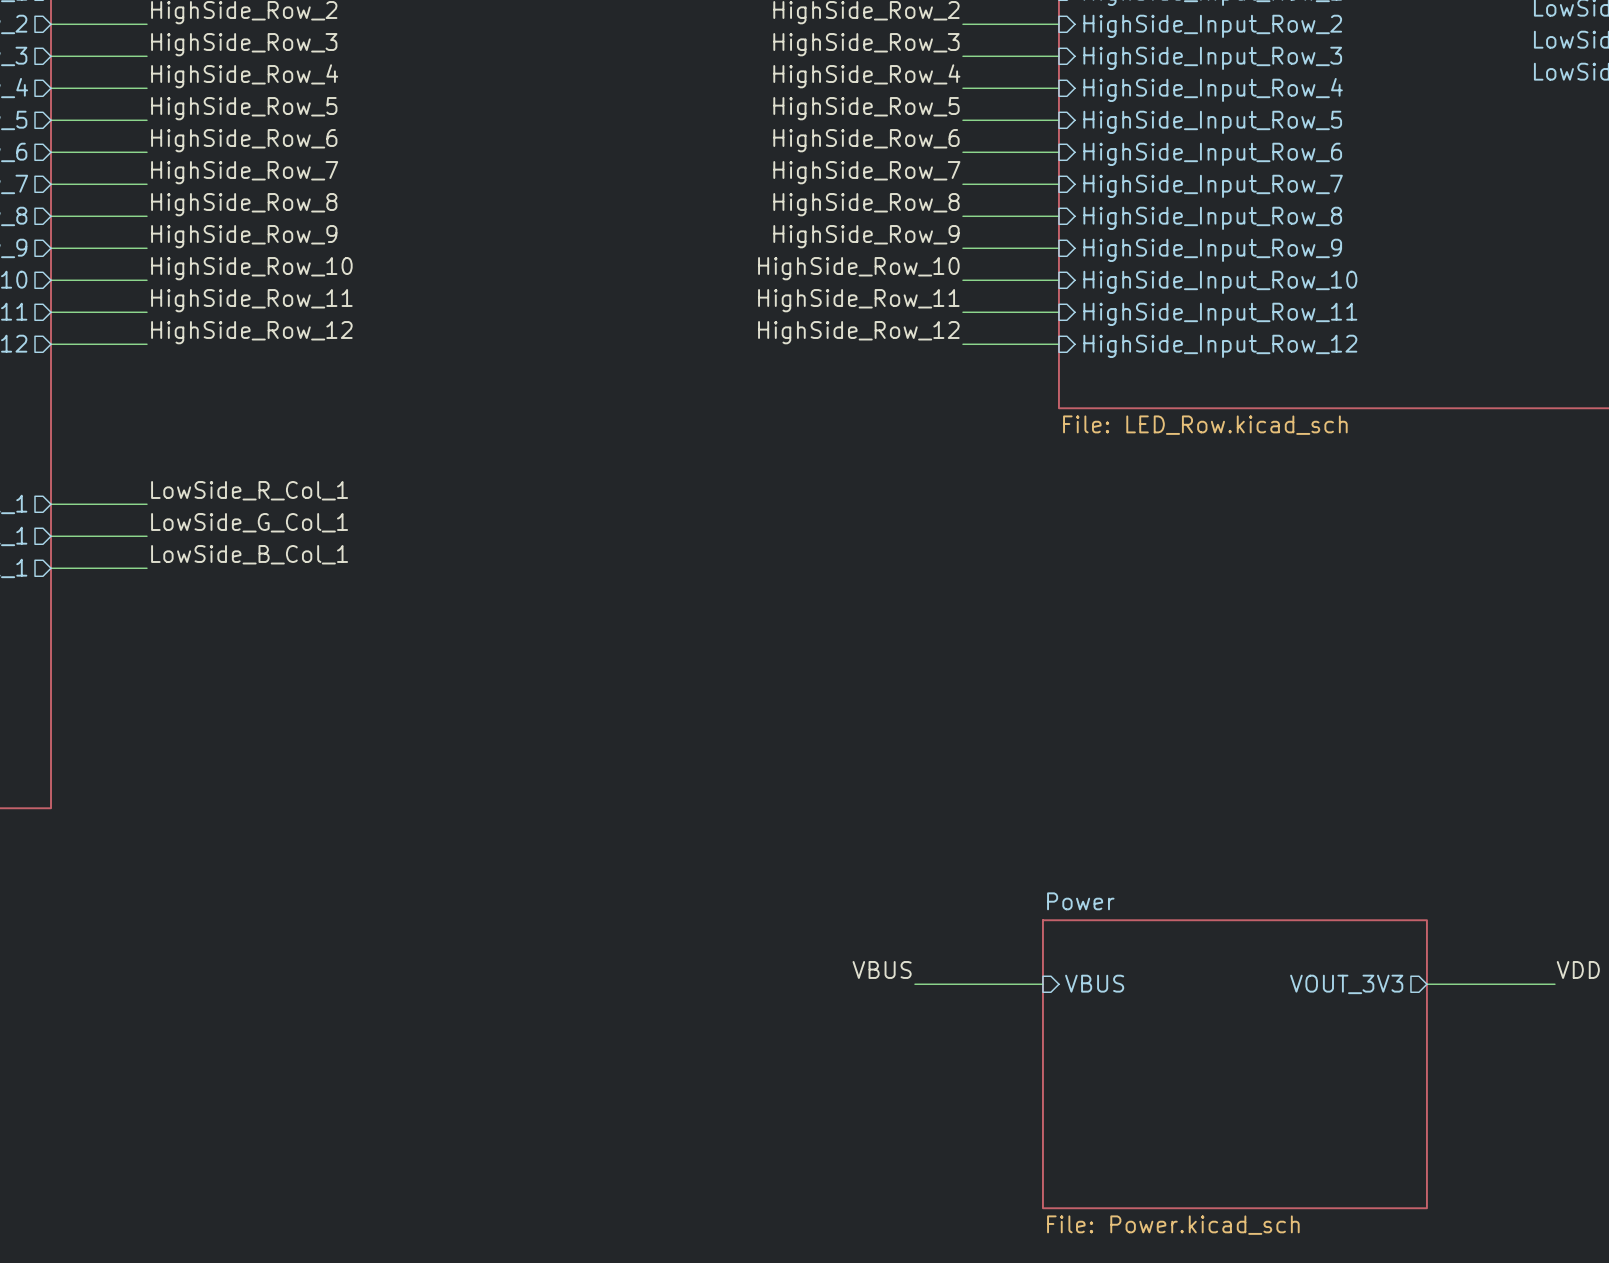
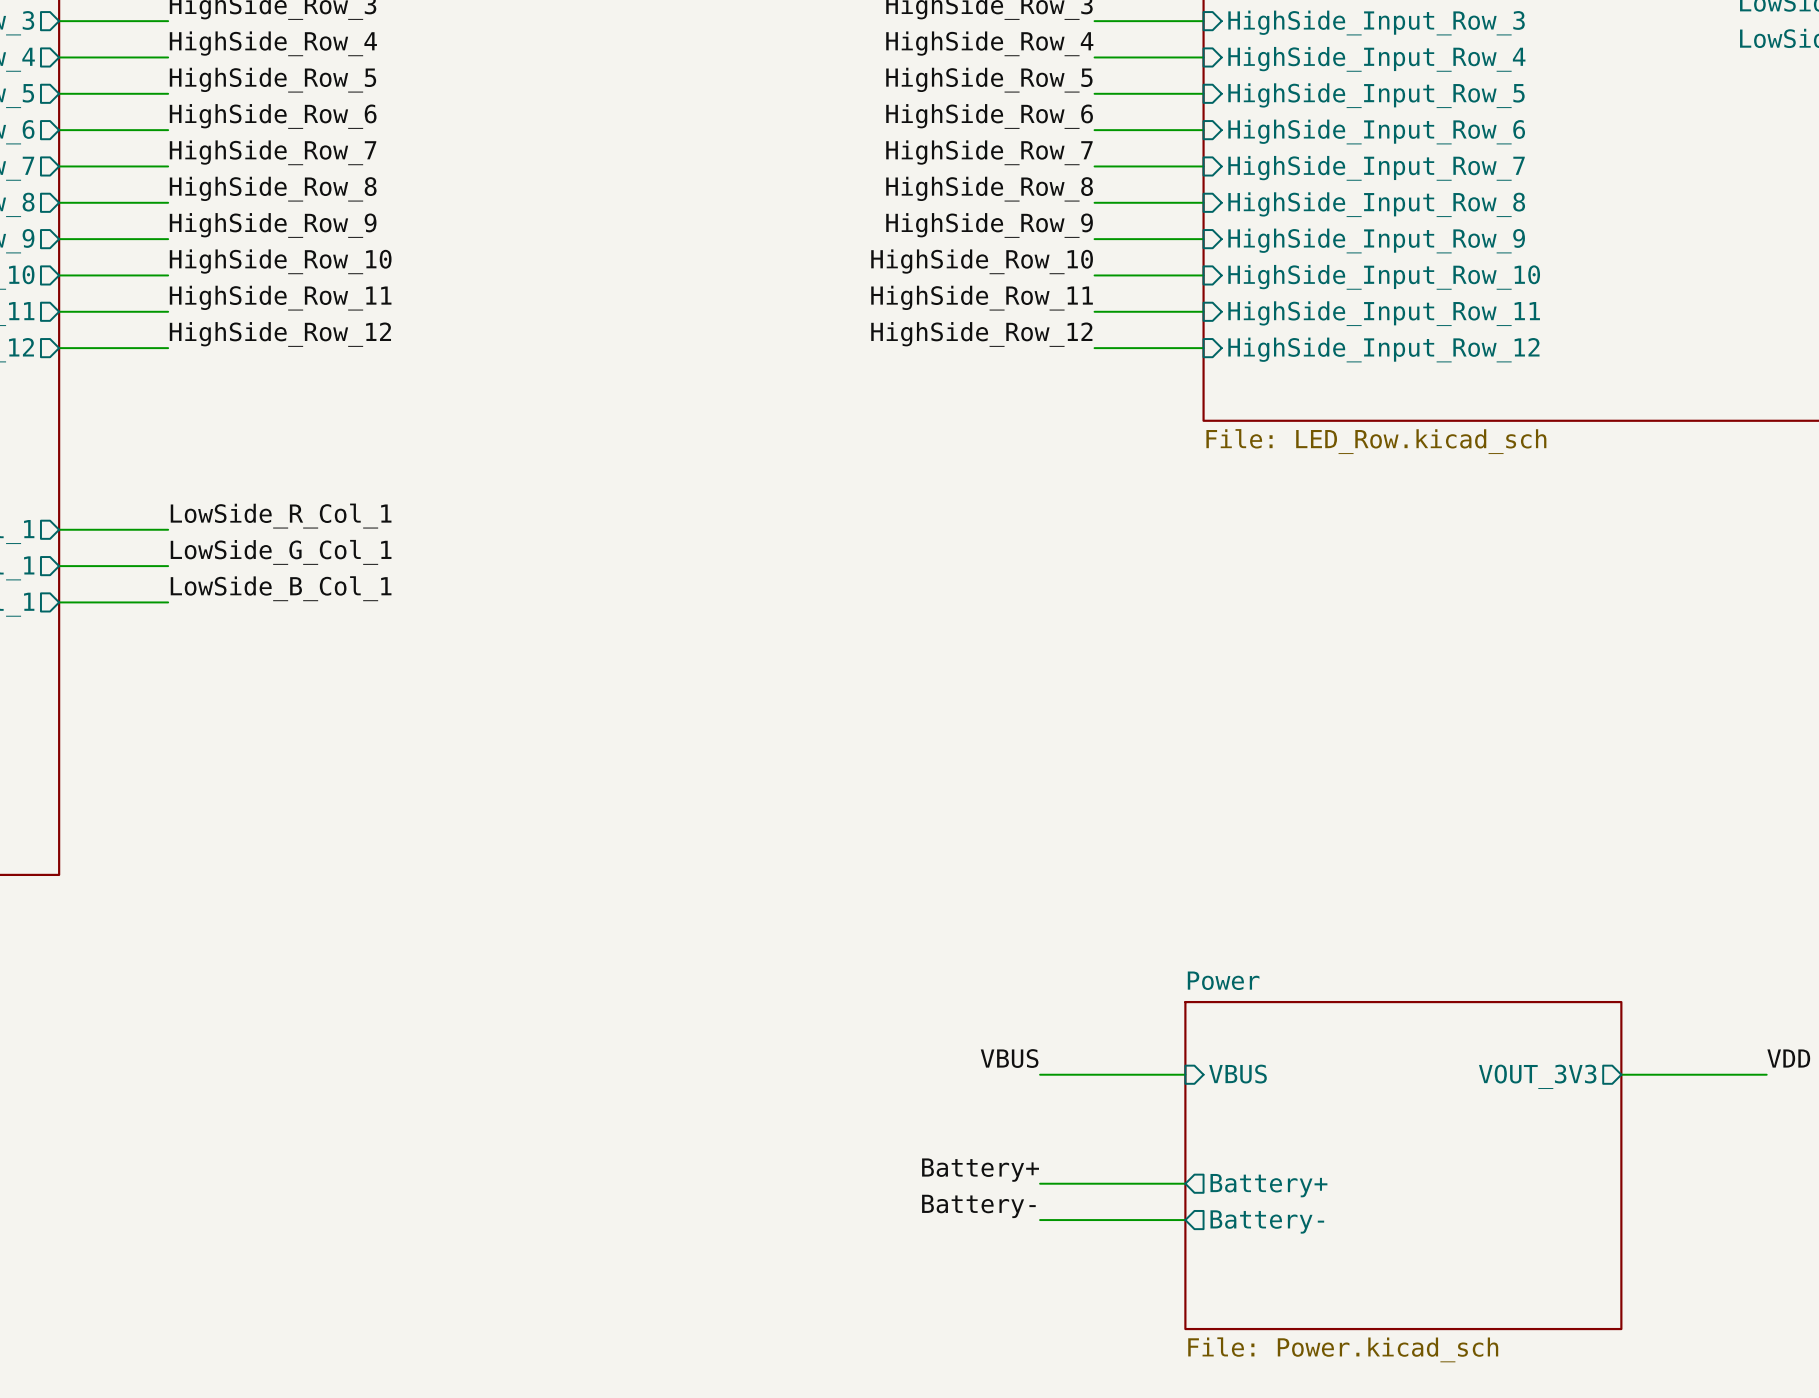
label: none -> Battery+ (980, 1170)
wire: none -> (1040, 1183) (1185, 1183)
sheet pin: none -> Battery+ (1268, 1185)
label: none -> Battery- (978, 1206)
wire: none -> (1040, 1220) (1185, 1220)
sheet pin: none -> Battery- (1267, 1221)

